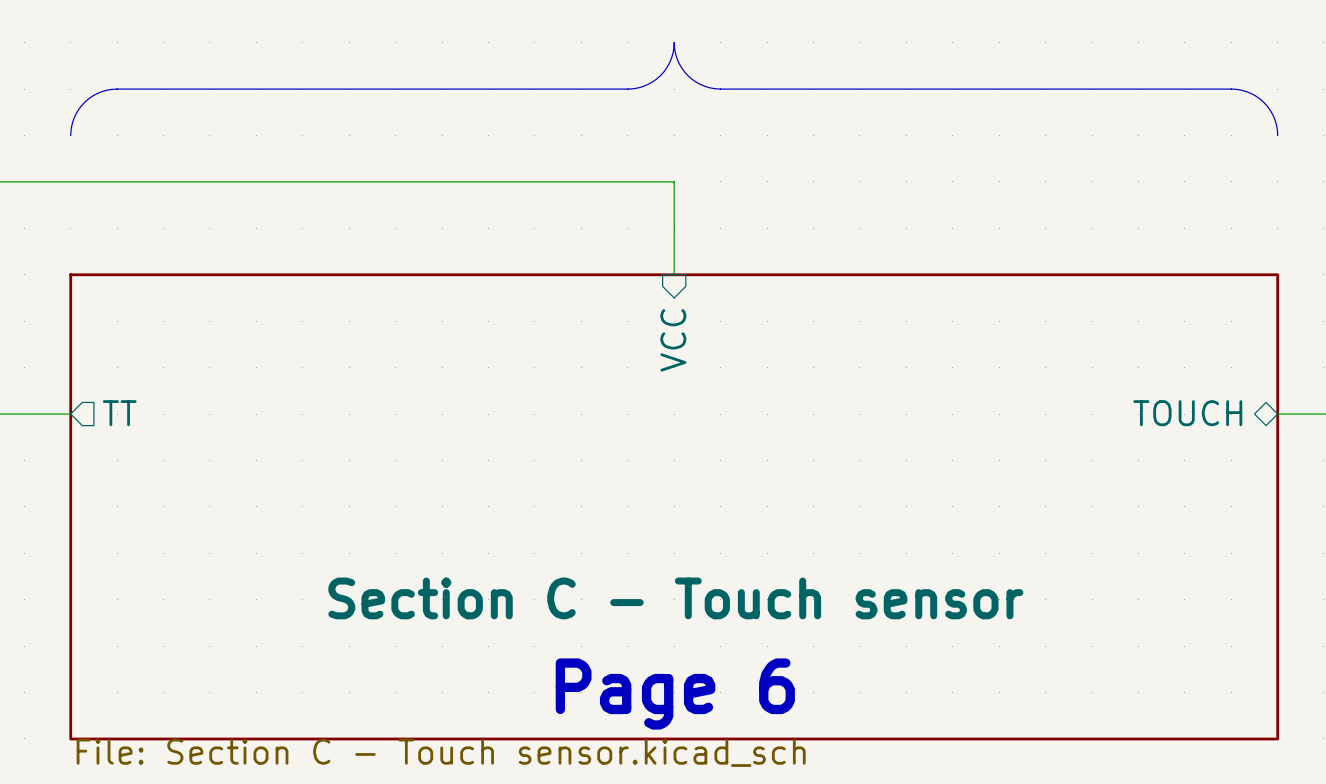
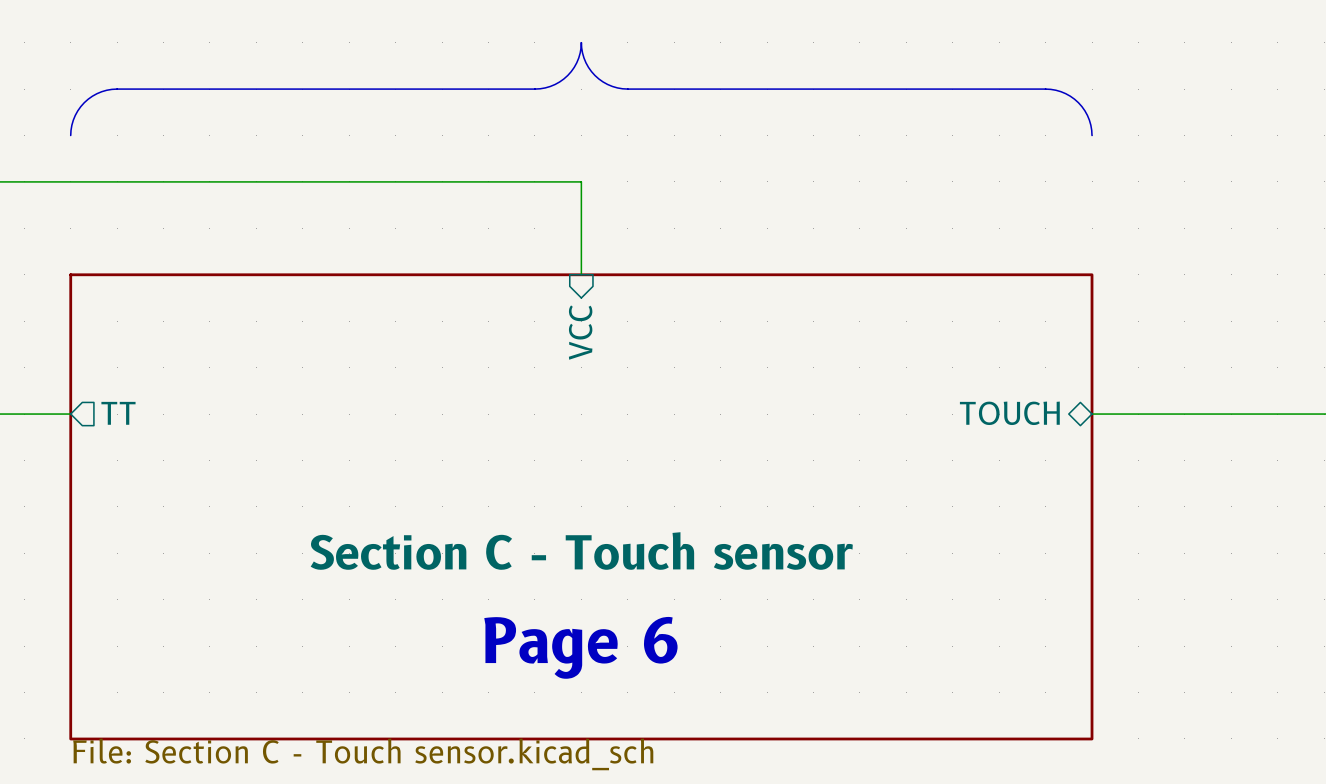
line: (534, 89) (627, 89) (643, 86) (656, 78) (664, 71) (671, 57) (674, 42) (678, 62) (687, 75) (700, 84) (720, 89) -> (534, 89) (555, 84) (567, 75) (576, 62) (581, 42) (583, 57) (591, 71) (598, 78) (612, 86) (627, 89) (720, 89)
line: (1045, 89) (1241, 90) (1255, 96) (1267, 106) (1275, 120) (1277, 135) -> (1045, 89) (1065, 93) (1078, 102) (1087, 115) (1092, 135)
wire: (581, 181) (674, 181) (674, 274) -> (581, 181) (581, 274)
sheet pin position: VCC (673, 340) -> VCC (580, 332)
sheet pin position: TOUCH (1187, 413) -> TOUCH (1009, 413)
wire: none -> (1092, 414) (1277, 414)
sheet Section C - Touch sensor: none -> File: Section C - Touch sensor.kicad_sch (581, 506)
sheet Section C - Touch sensor: File: Section C - Touch sensor.kicad_sch (674, 506) -> none
text position: Page 6 (675, 694) -> Page 6 (580, 647)

